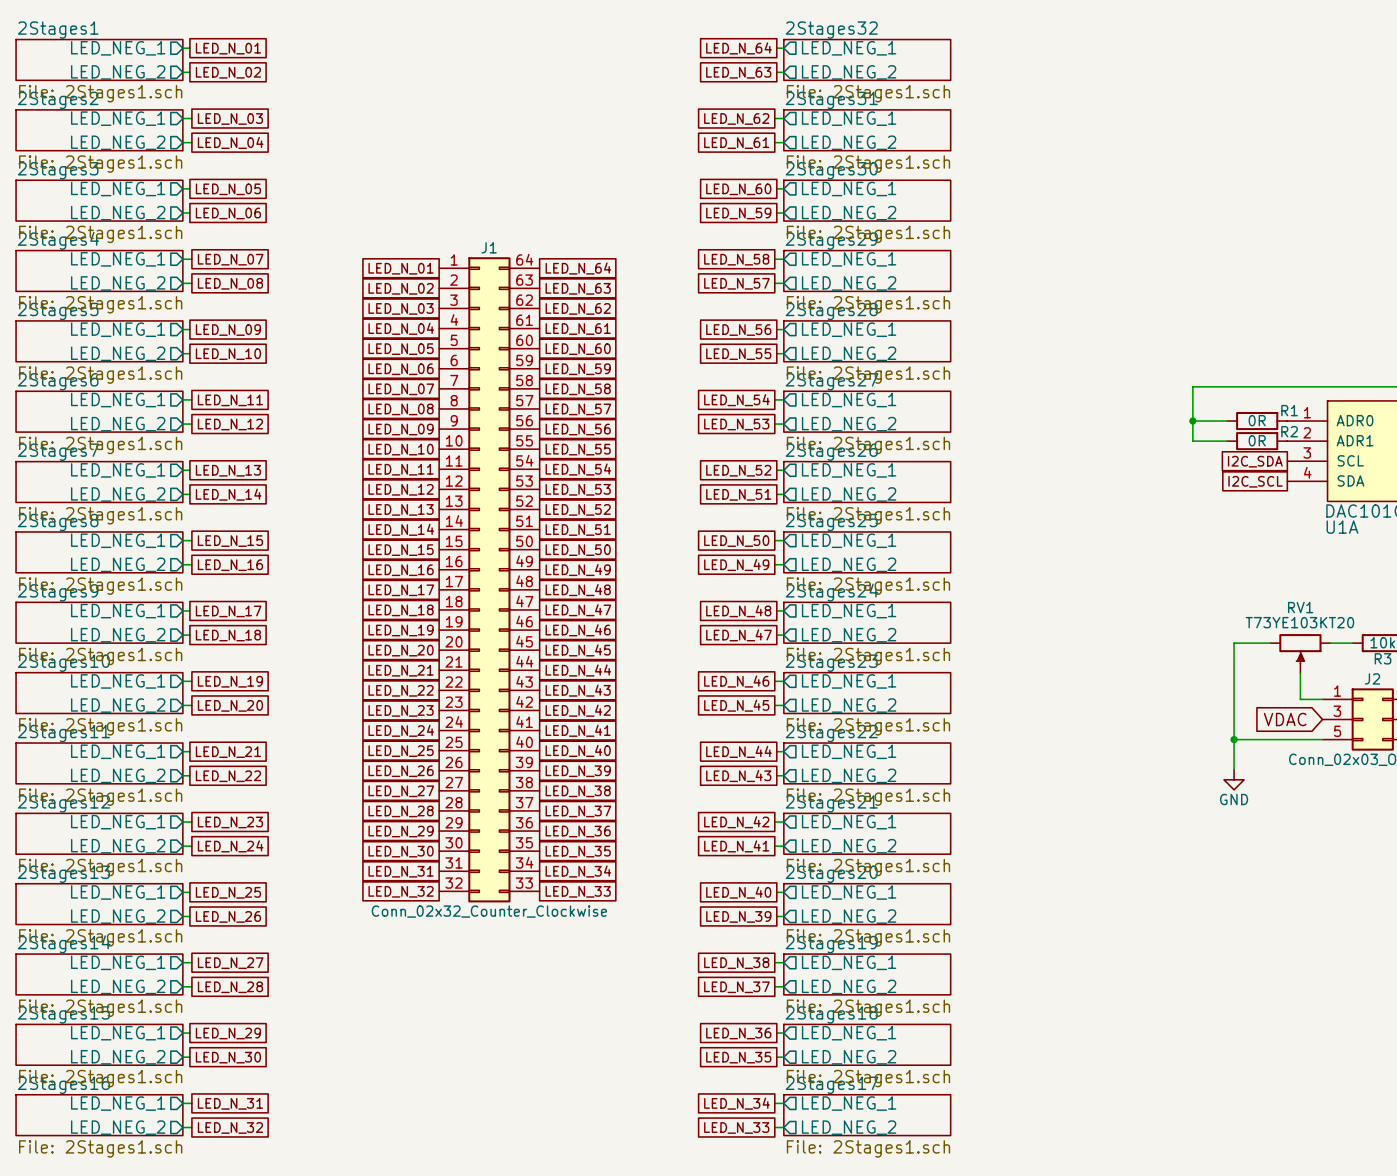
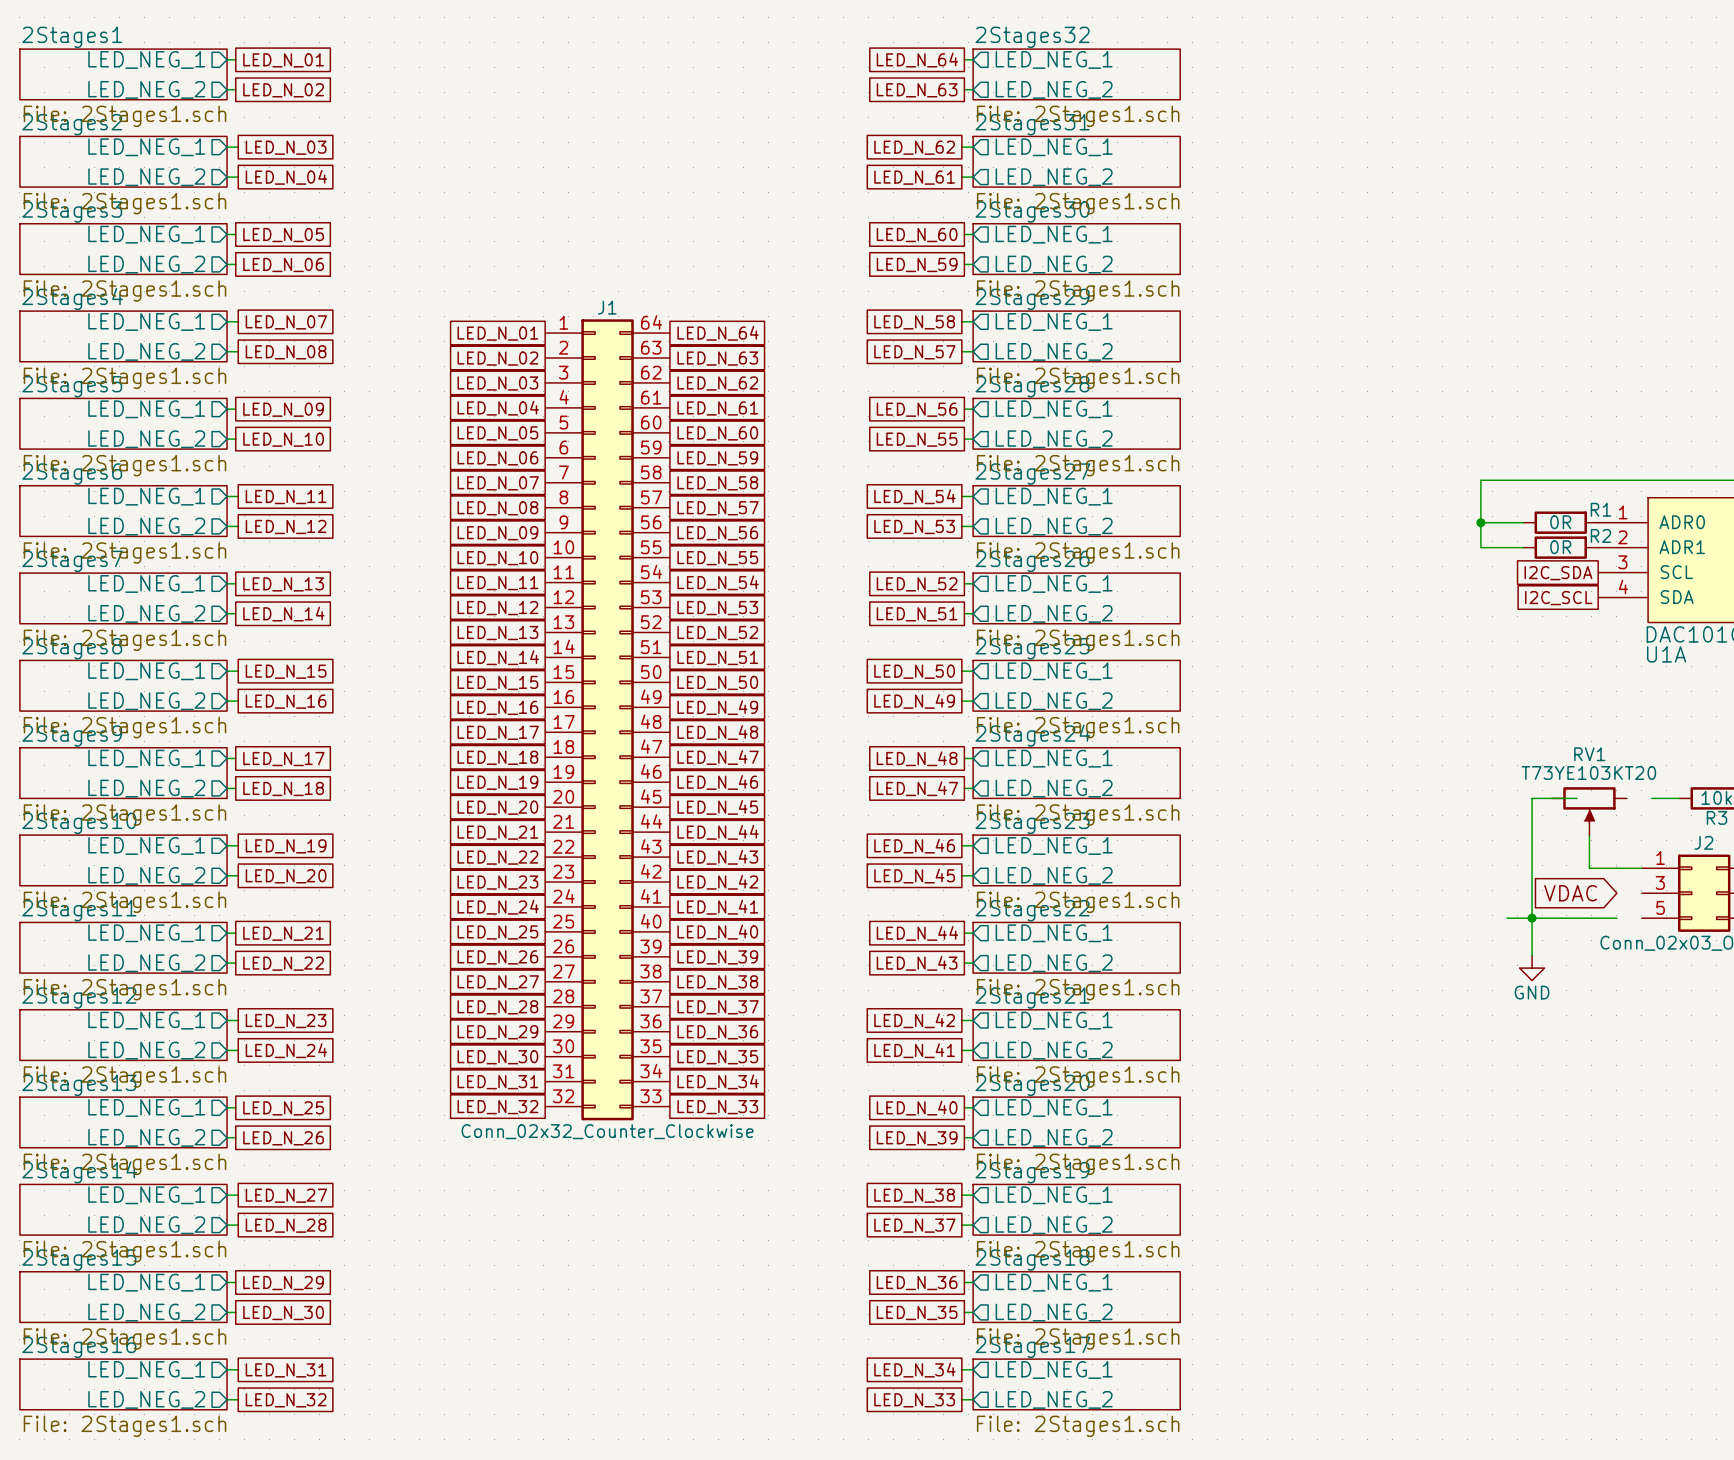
RV1 position: (1300, 653) -> (1589, 811)
wire: (1300, 673) (1300, 699) -> (1589, 835) (1589, 868) (1614, 868)
global label position: VDAC (1285, 719) -> VDAC (1570, 893)
wire: (1302, 739) (1322, 739) -> (1507, 918) (1532, 918)

